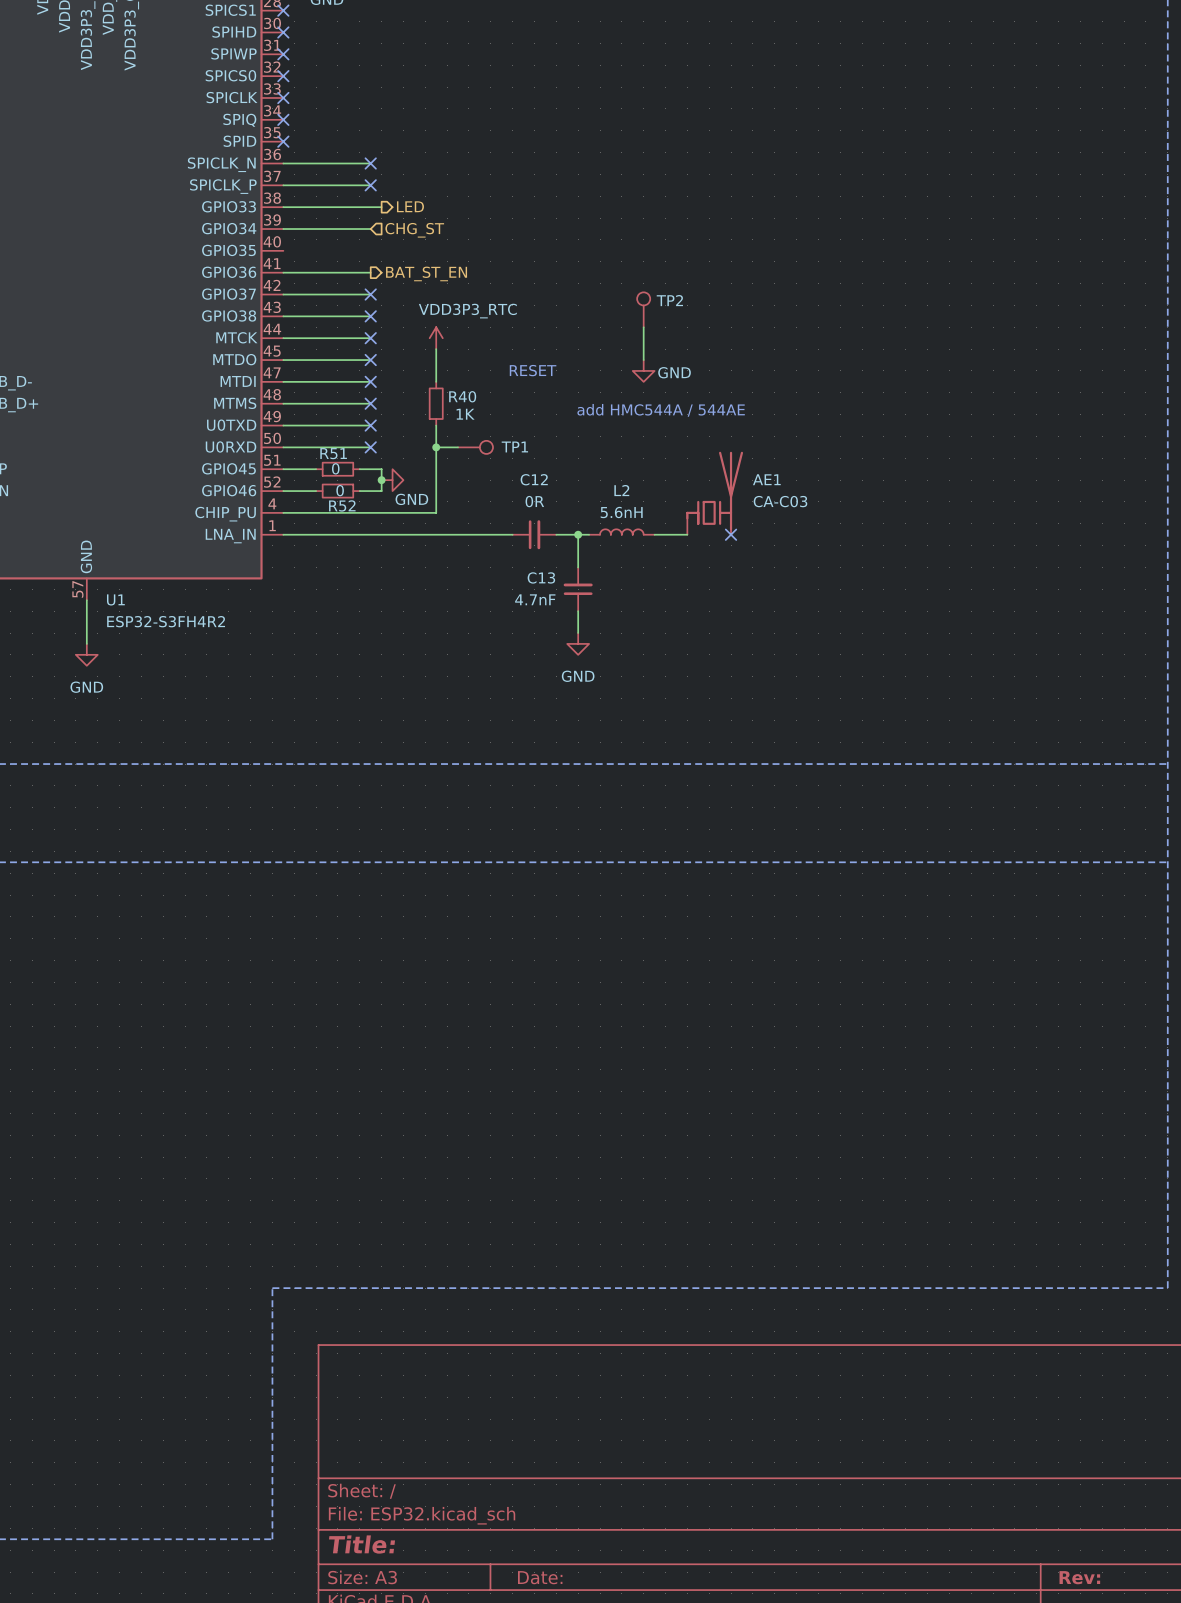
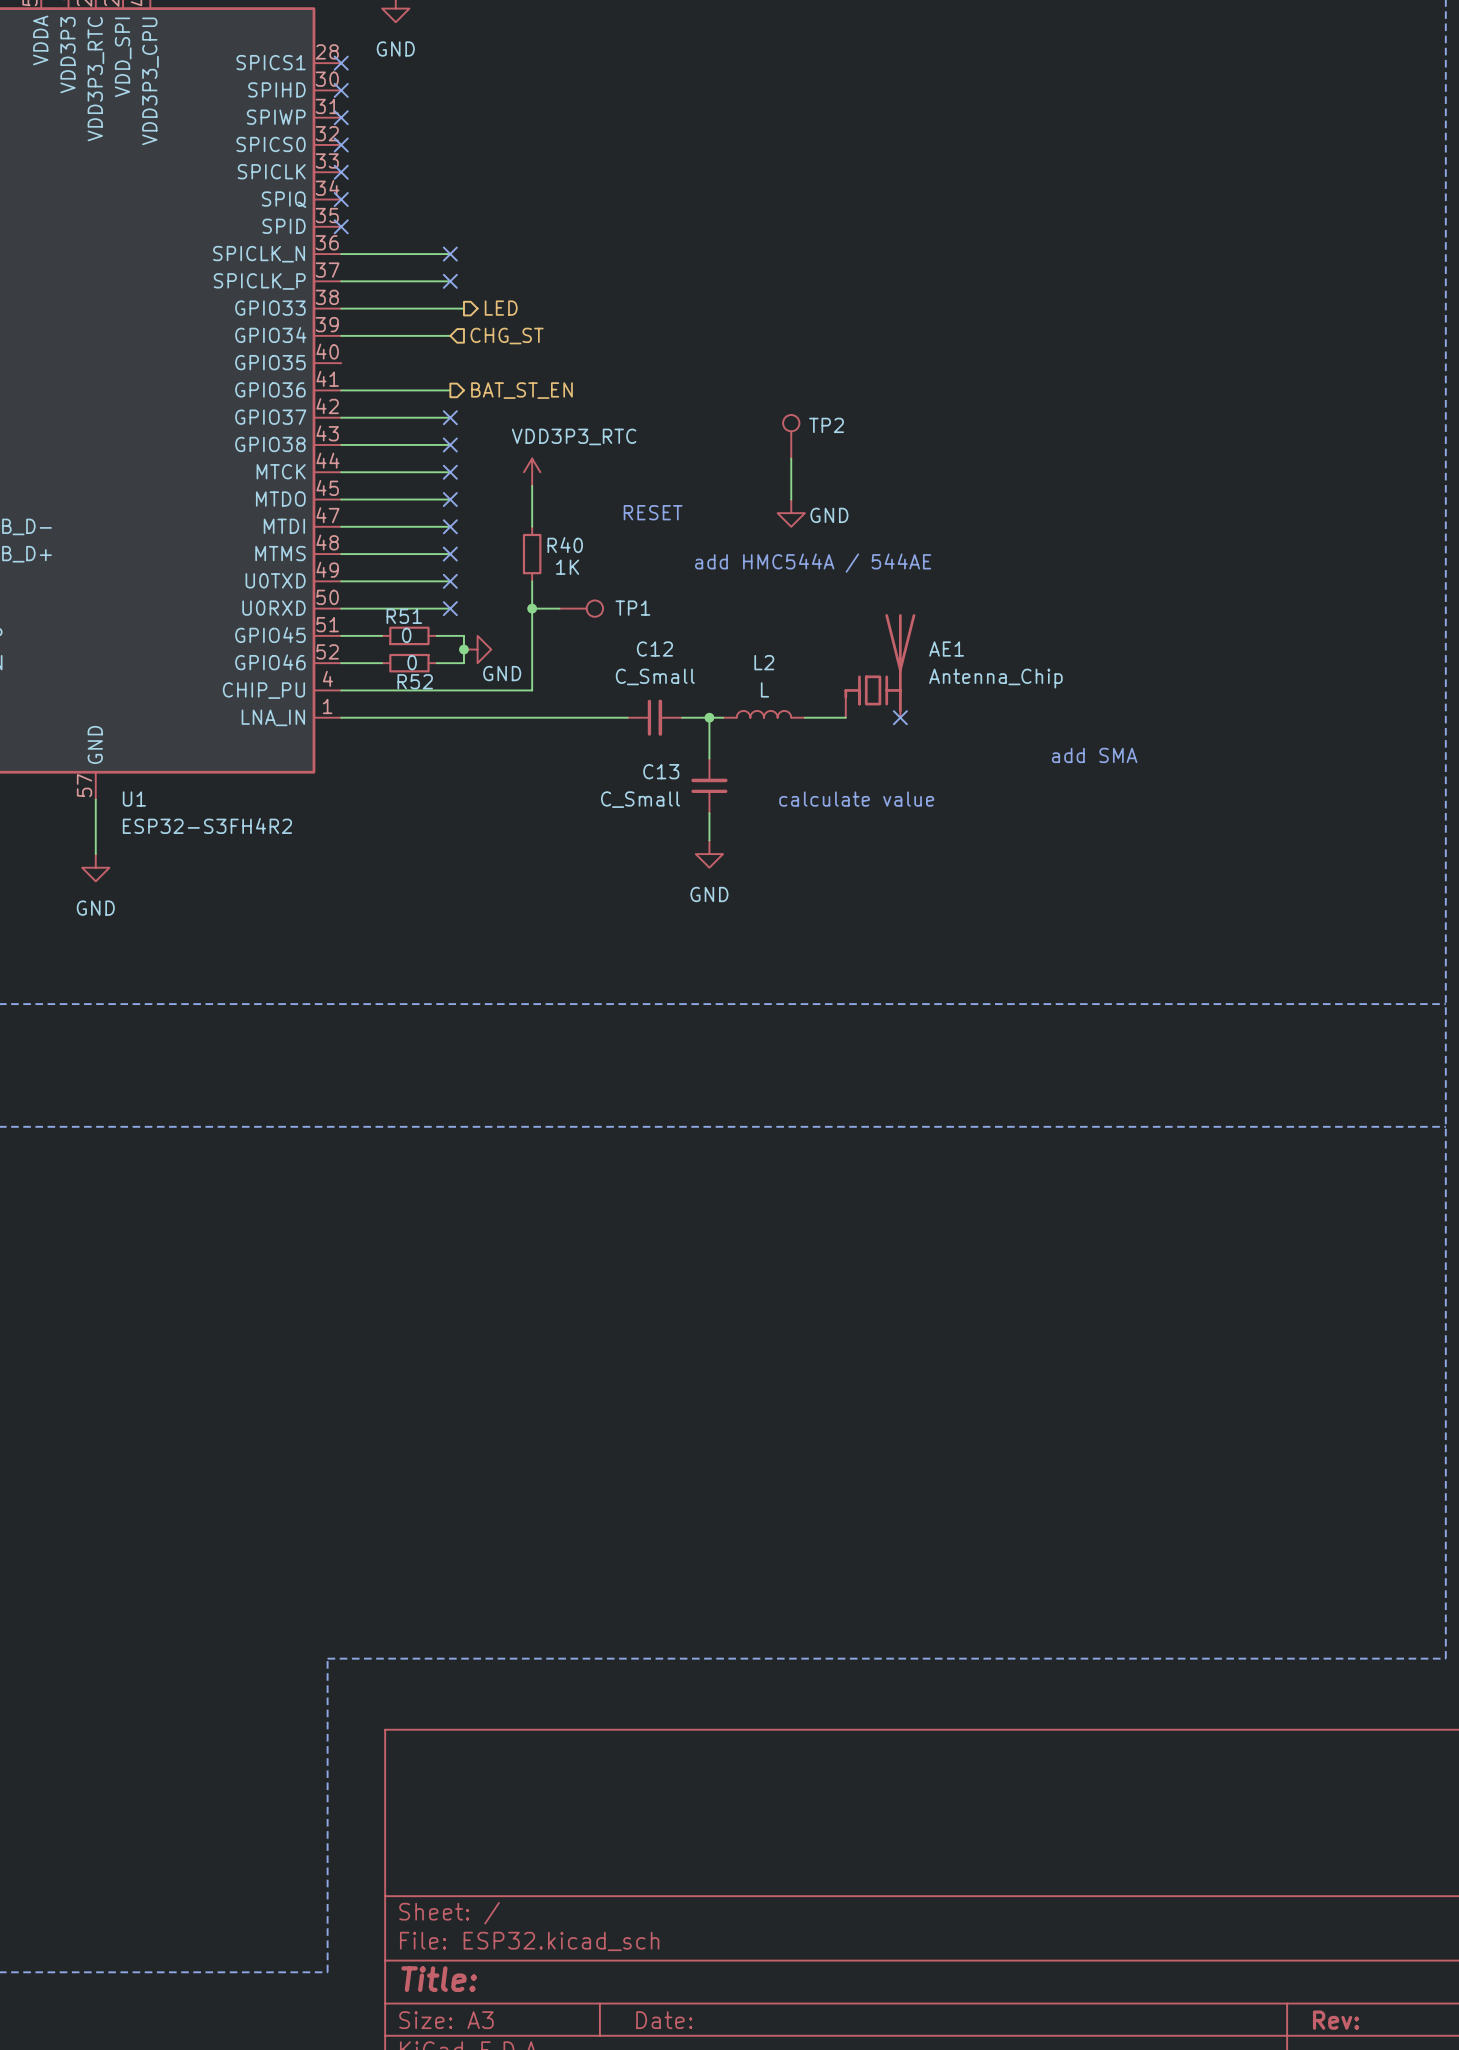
C12 value: 0R (534, 501) -> C_Small (655, 676)
AE1 value: CA-C03 (780, 501) -> Antenna_Chip (995, 678)
L2 value: 5.6nH (621, 512) -> L (764, 689)
text: none -> add SMA (1094, 755)
C13 value: 4.7nF (535, 599) -> C_Small (640, 799)
text: none -> calculate value (856, 799)

